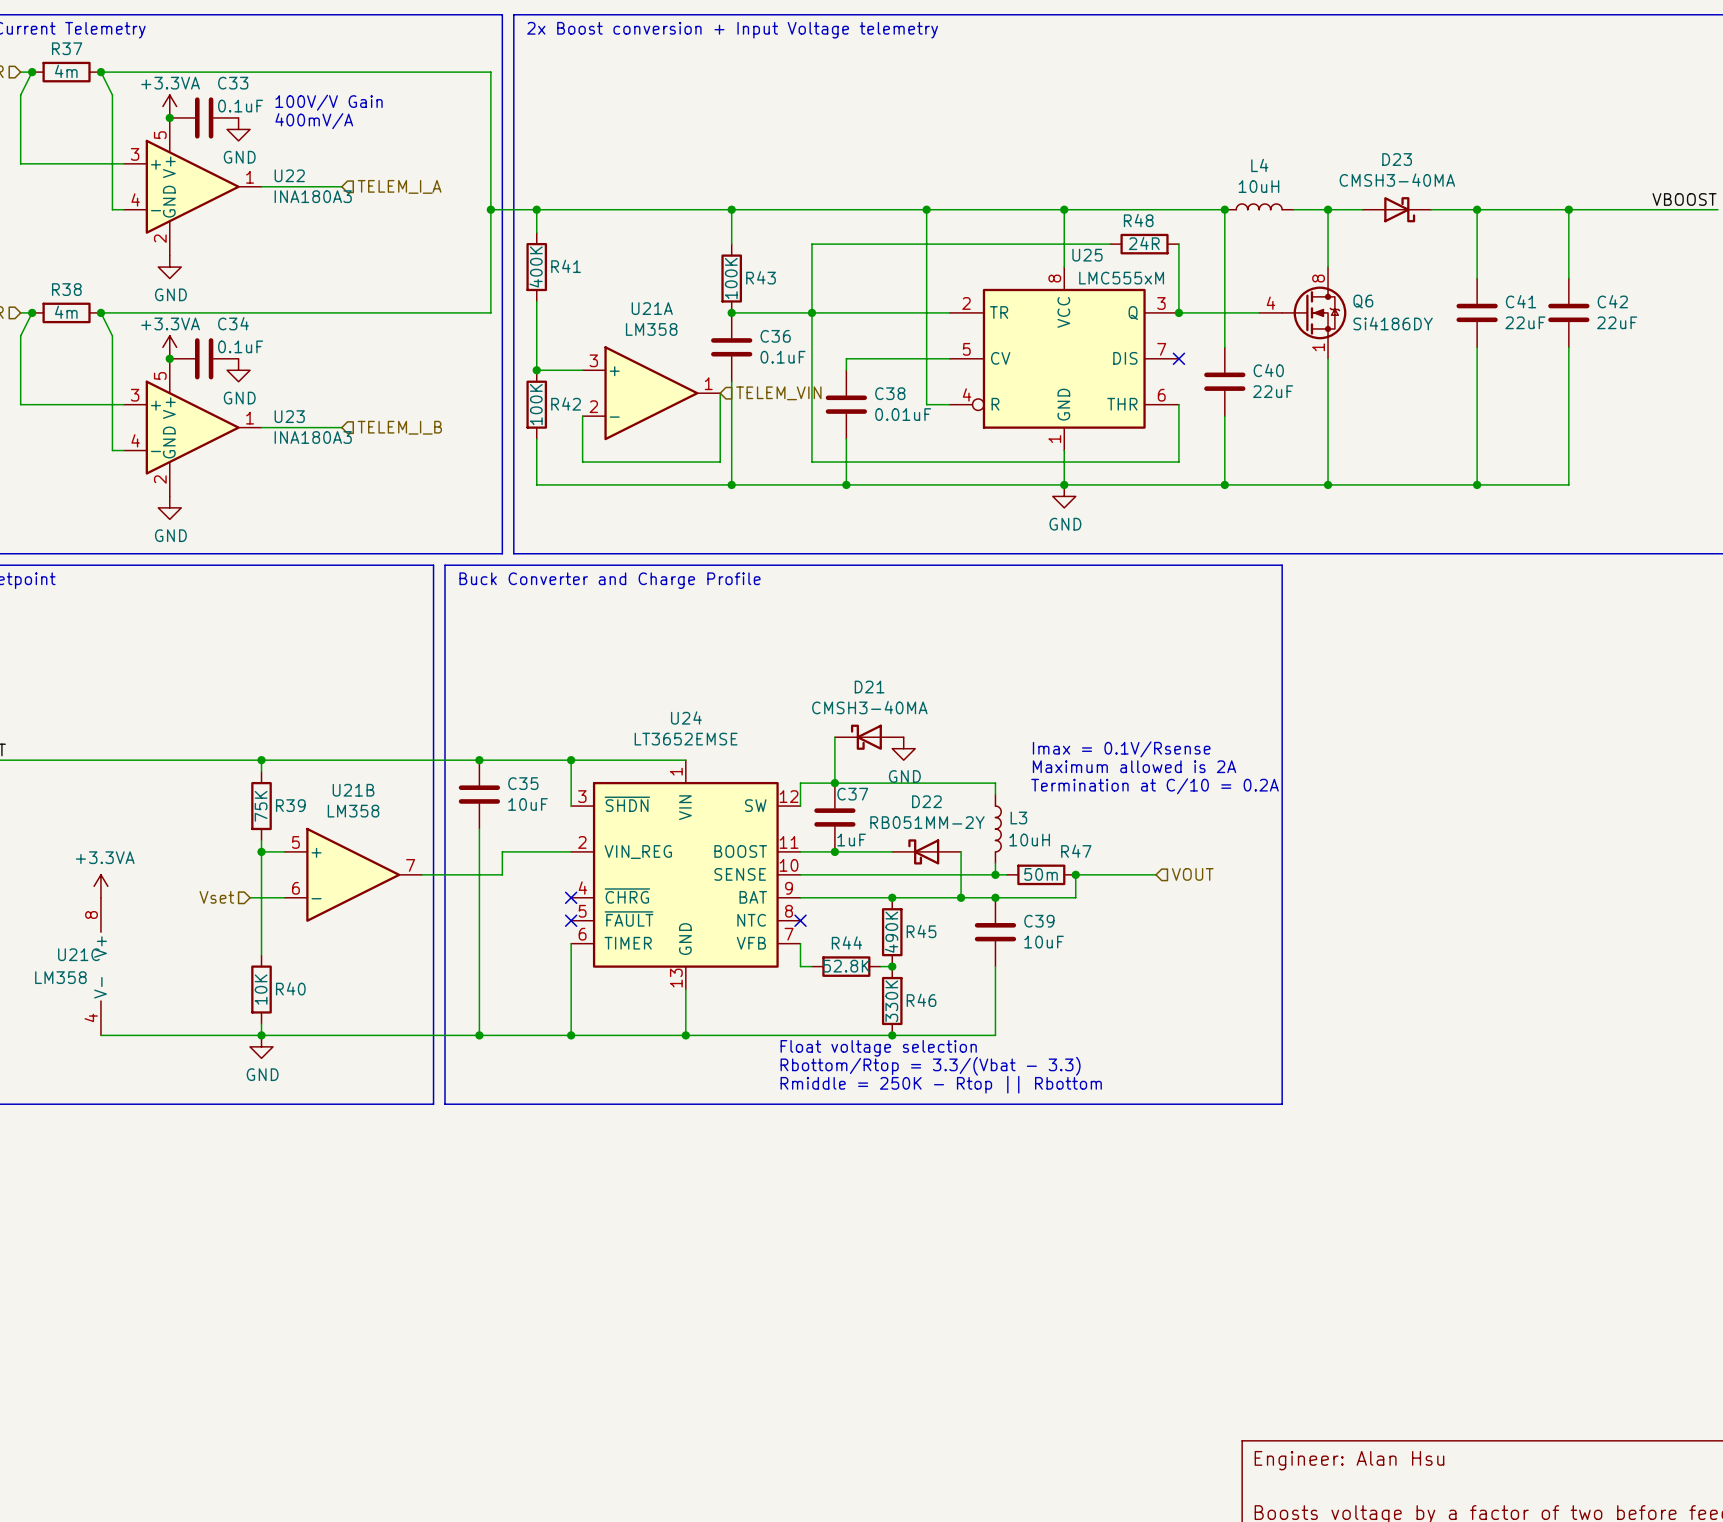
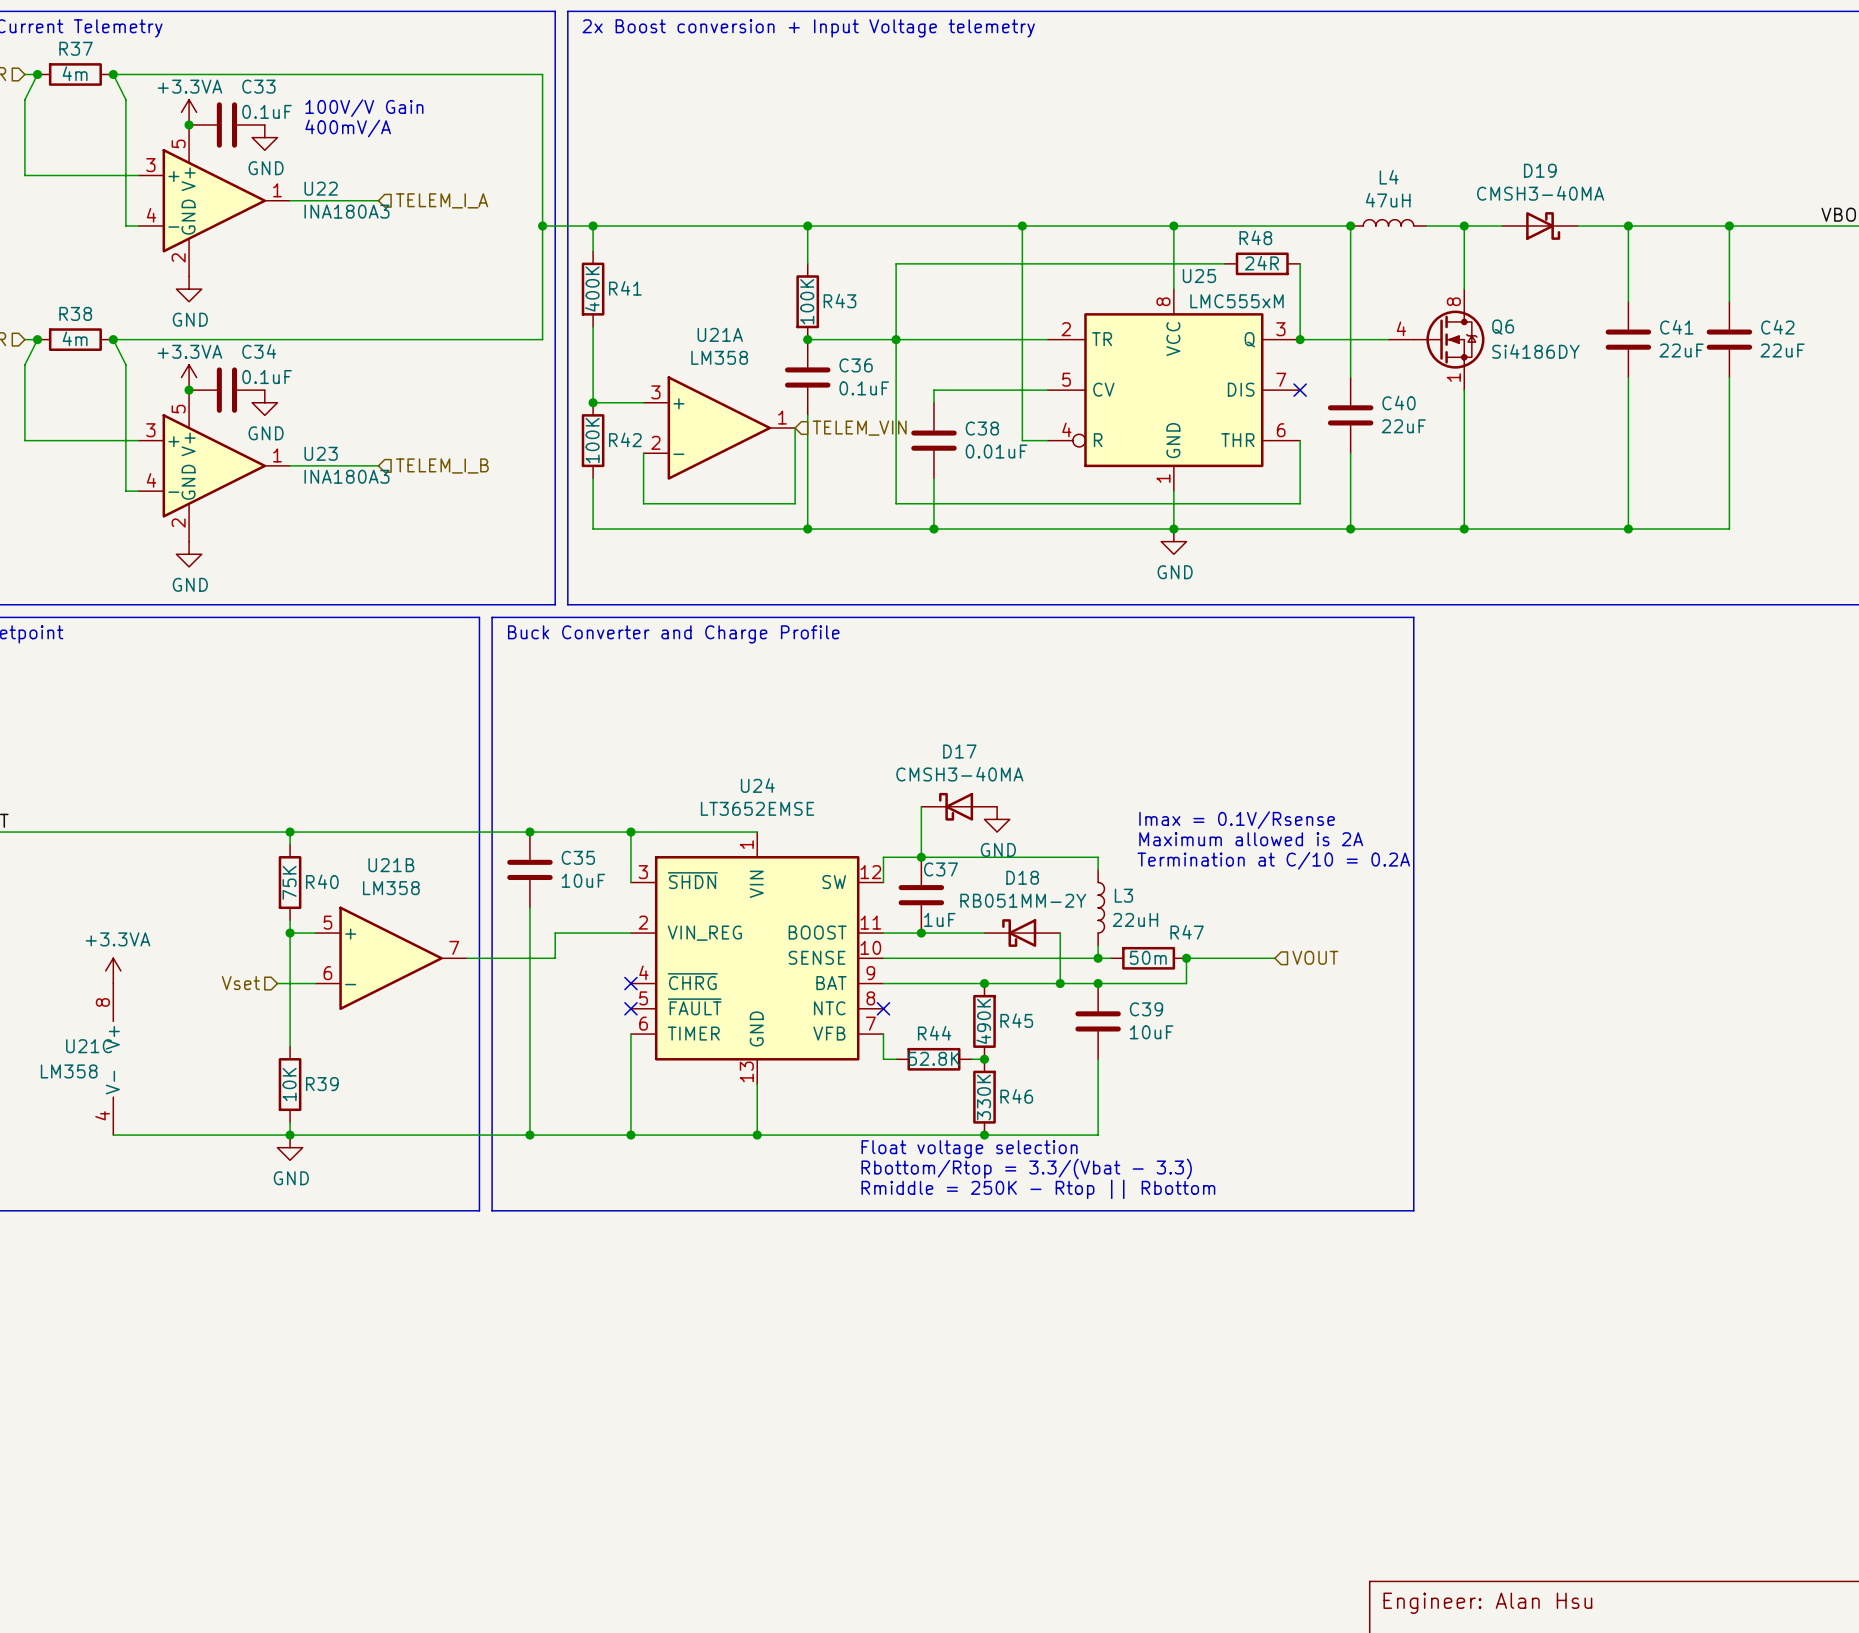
D23 name: D23 (1397, 159) -> D19 (1540, 170)
L4 value: 10uH (1258, 186) -> 47uH (1388, 200)
D21 name: D21 (869, 687) -> D17 (959, 751)
D22 name: D22 (926, 801) -> D18 (1022, 877)
R39 name: R39 (290, 805) -> R40 (322, 881)
L3 value: 10uH (1029, 840) -> 22uH (1135, 919)
R40 name: R40 (290, 988) -> R39 (322, 1084)

